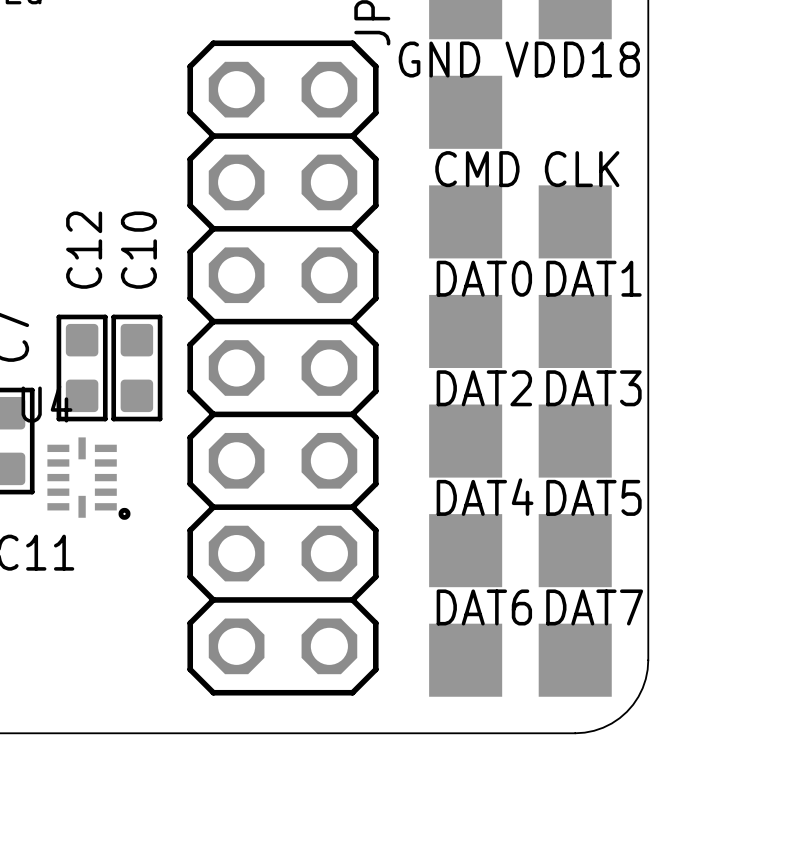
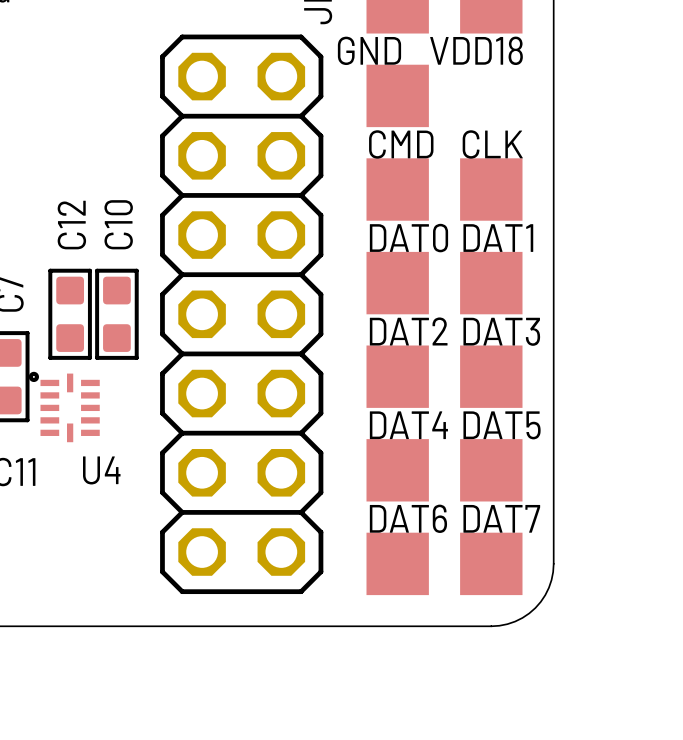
U4 rotation: 0° (88, 478) -> 180° (64, 407)

